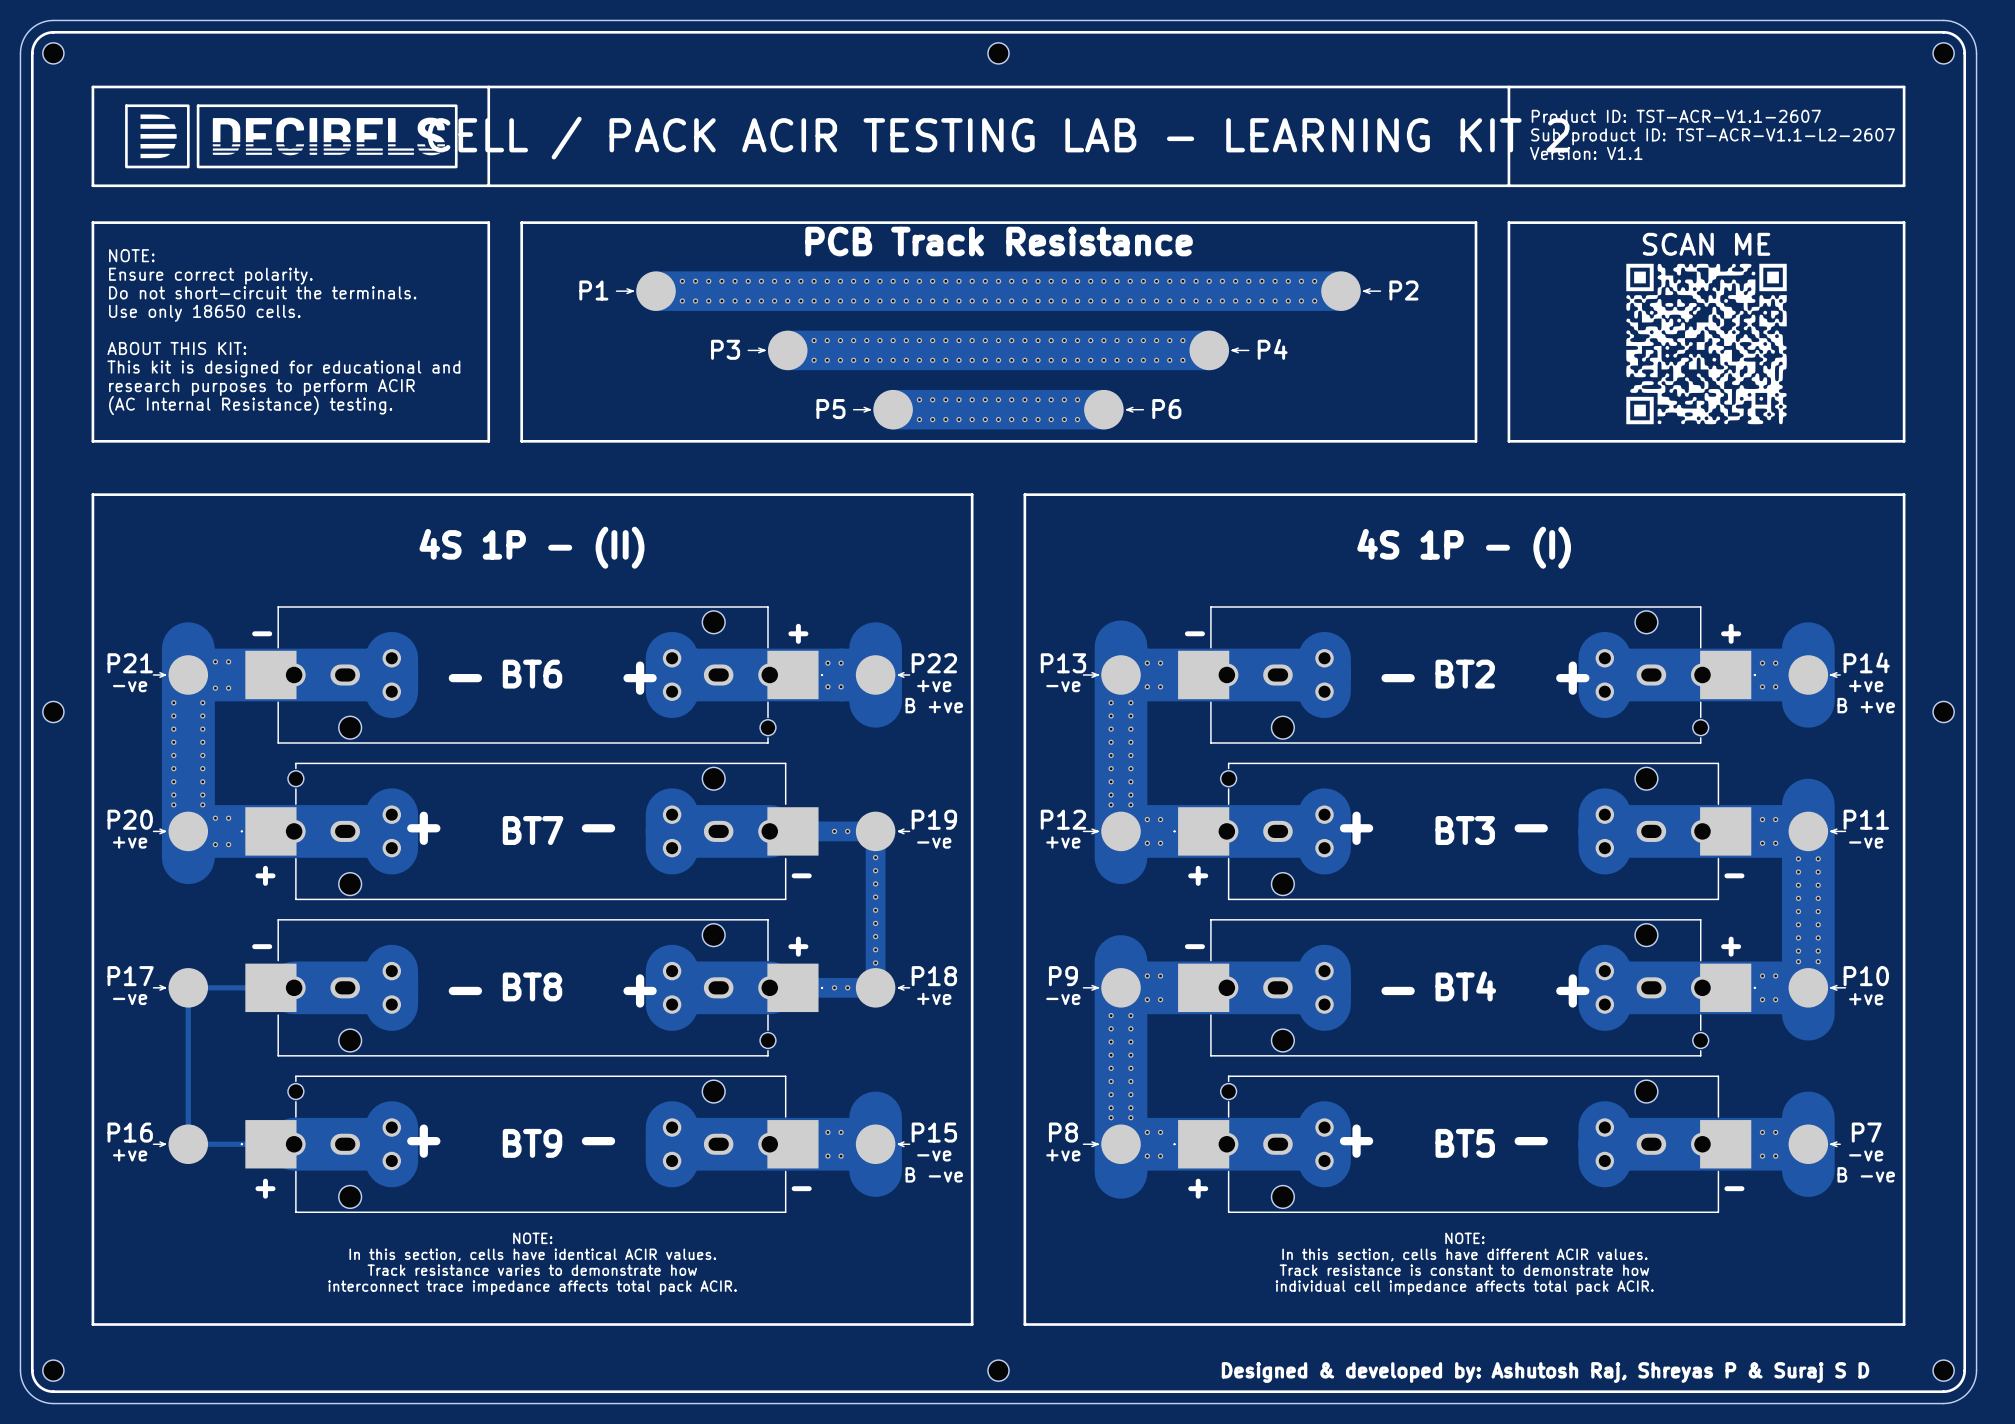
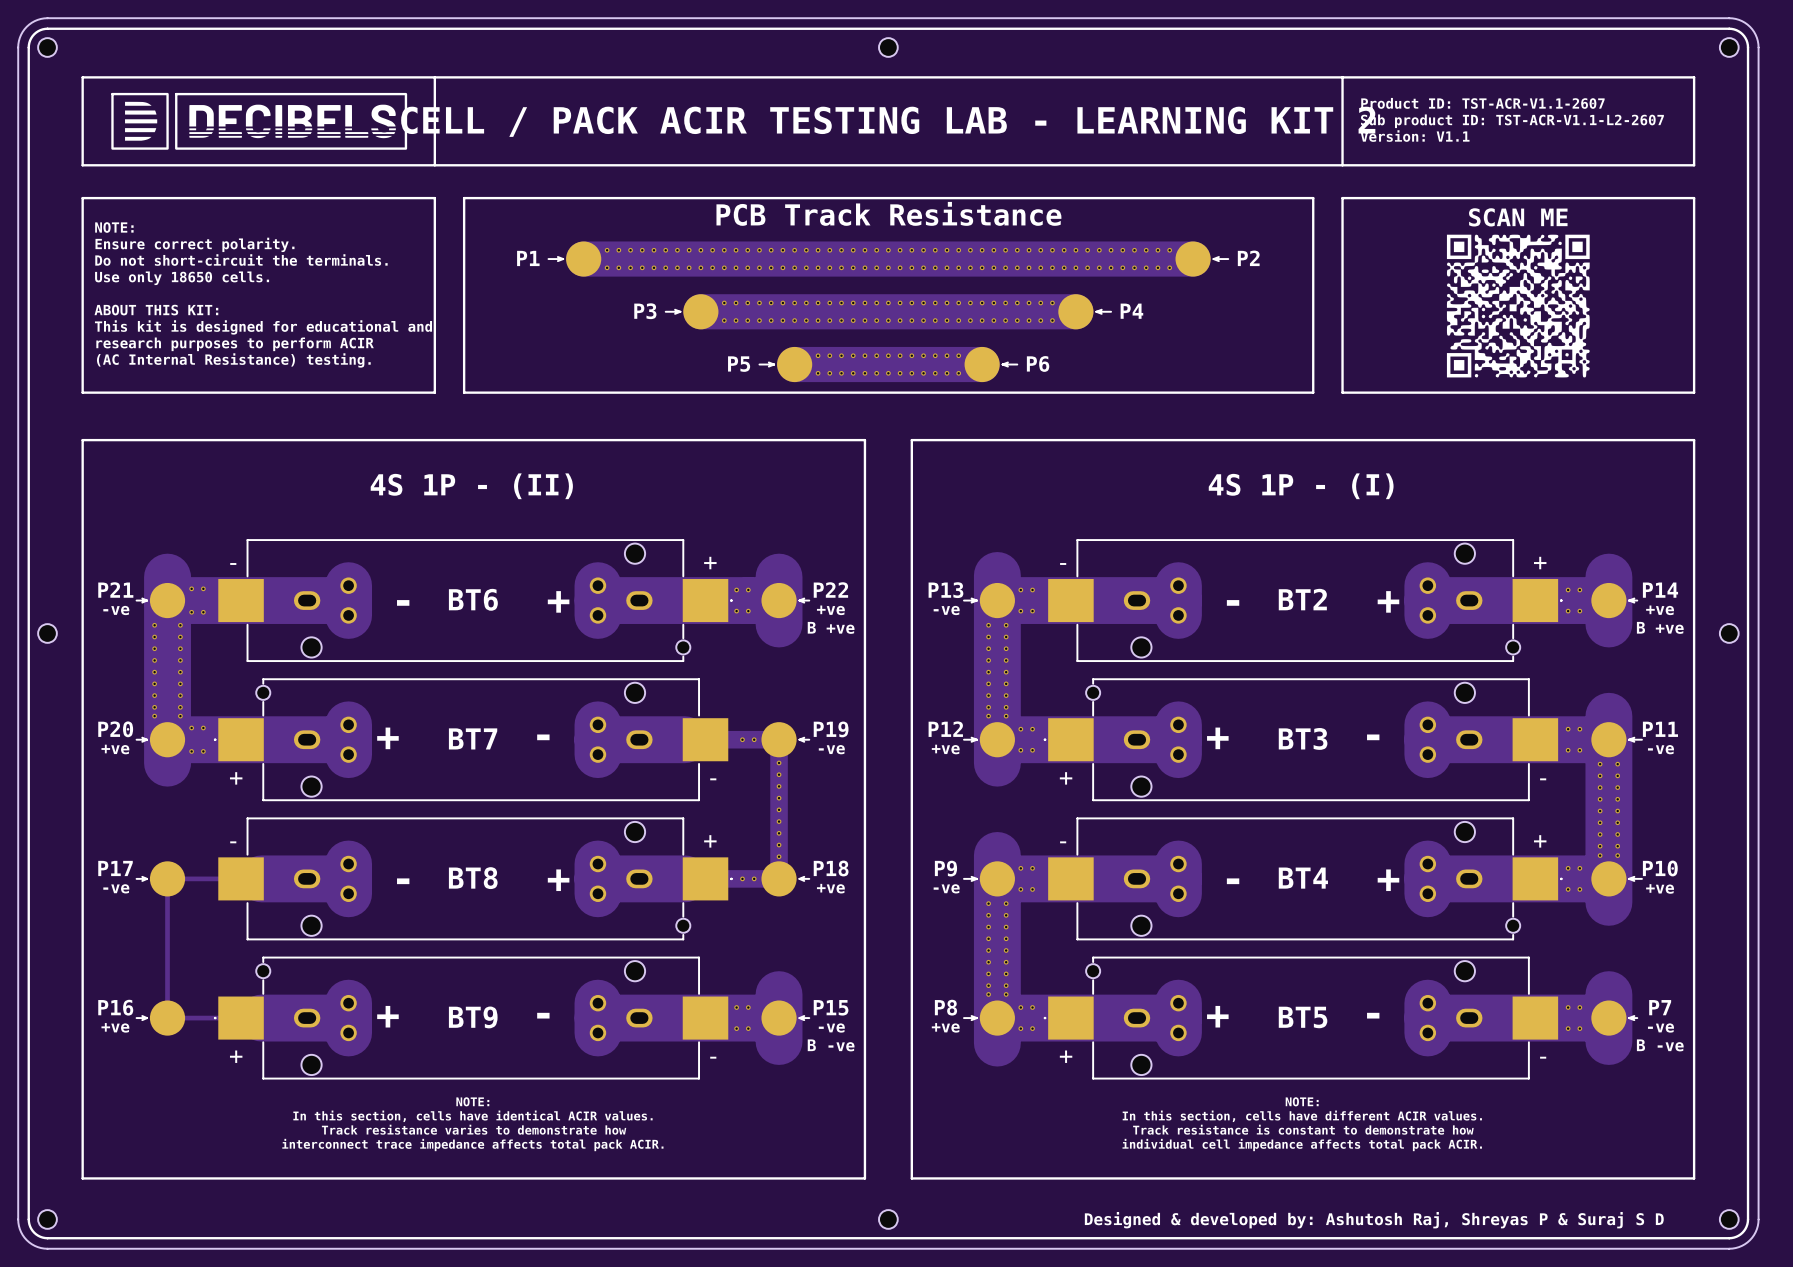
BT6 footprint: [245, 606, 823, 744] -> [218, 539, 732, 662]
BT2 footprint: [1178, 606, 1756, 744] -> [1048, 539, 1562, 662]
BT7 footprint: [241, 762, 819, 901] -> [214, 678, 729, 801]
BT3 footprint: [1173, 762, 1752, 901] -> [1044, 678, 1559, 801]
BT8 footprint: [245, 919, 823, 1057] -> [218, 817, 732, 940]
BT4 footprint: [1178, 919, 1756, 1057] -> [1048, 817, 1562, 940]
BT9 footprint: [241, 1075, 819, 1213] -> [214, 956, 729, 1080]
BT5 footprint: [1173, 1075, 1752, 1213] -> [1044, 956, 1559, 1080]

